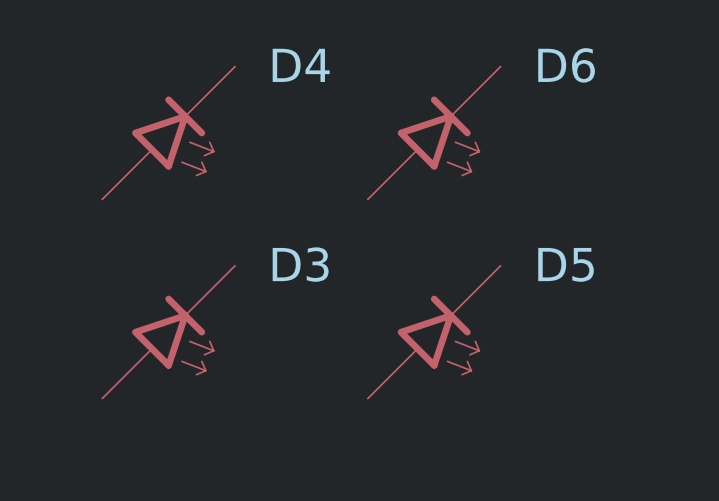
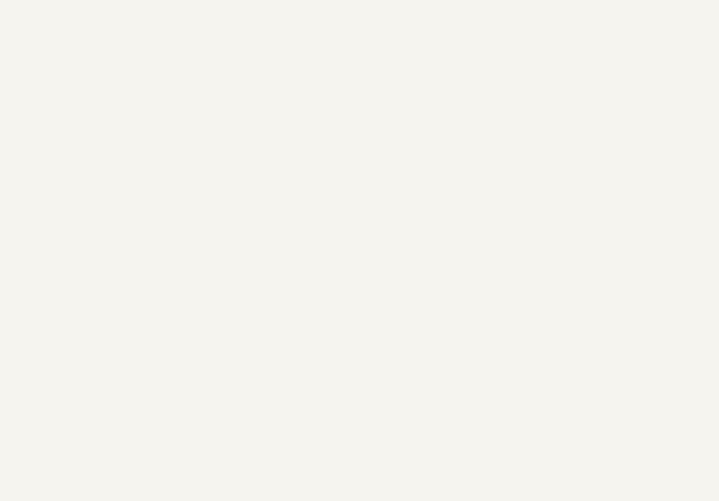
D4: (168, 133) -> none
D6: (434, 133) -> none
D3: (168, 332) -> none
D5: (434, 332) -> none

